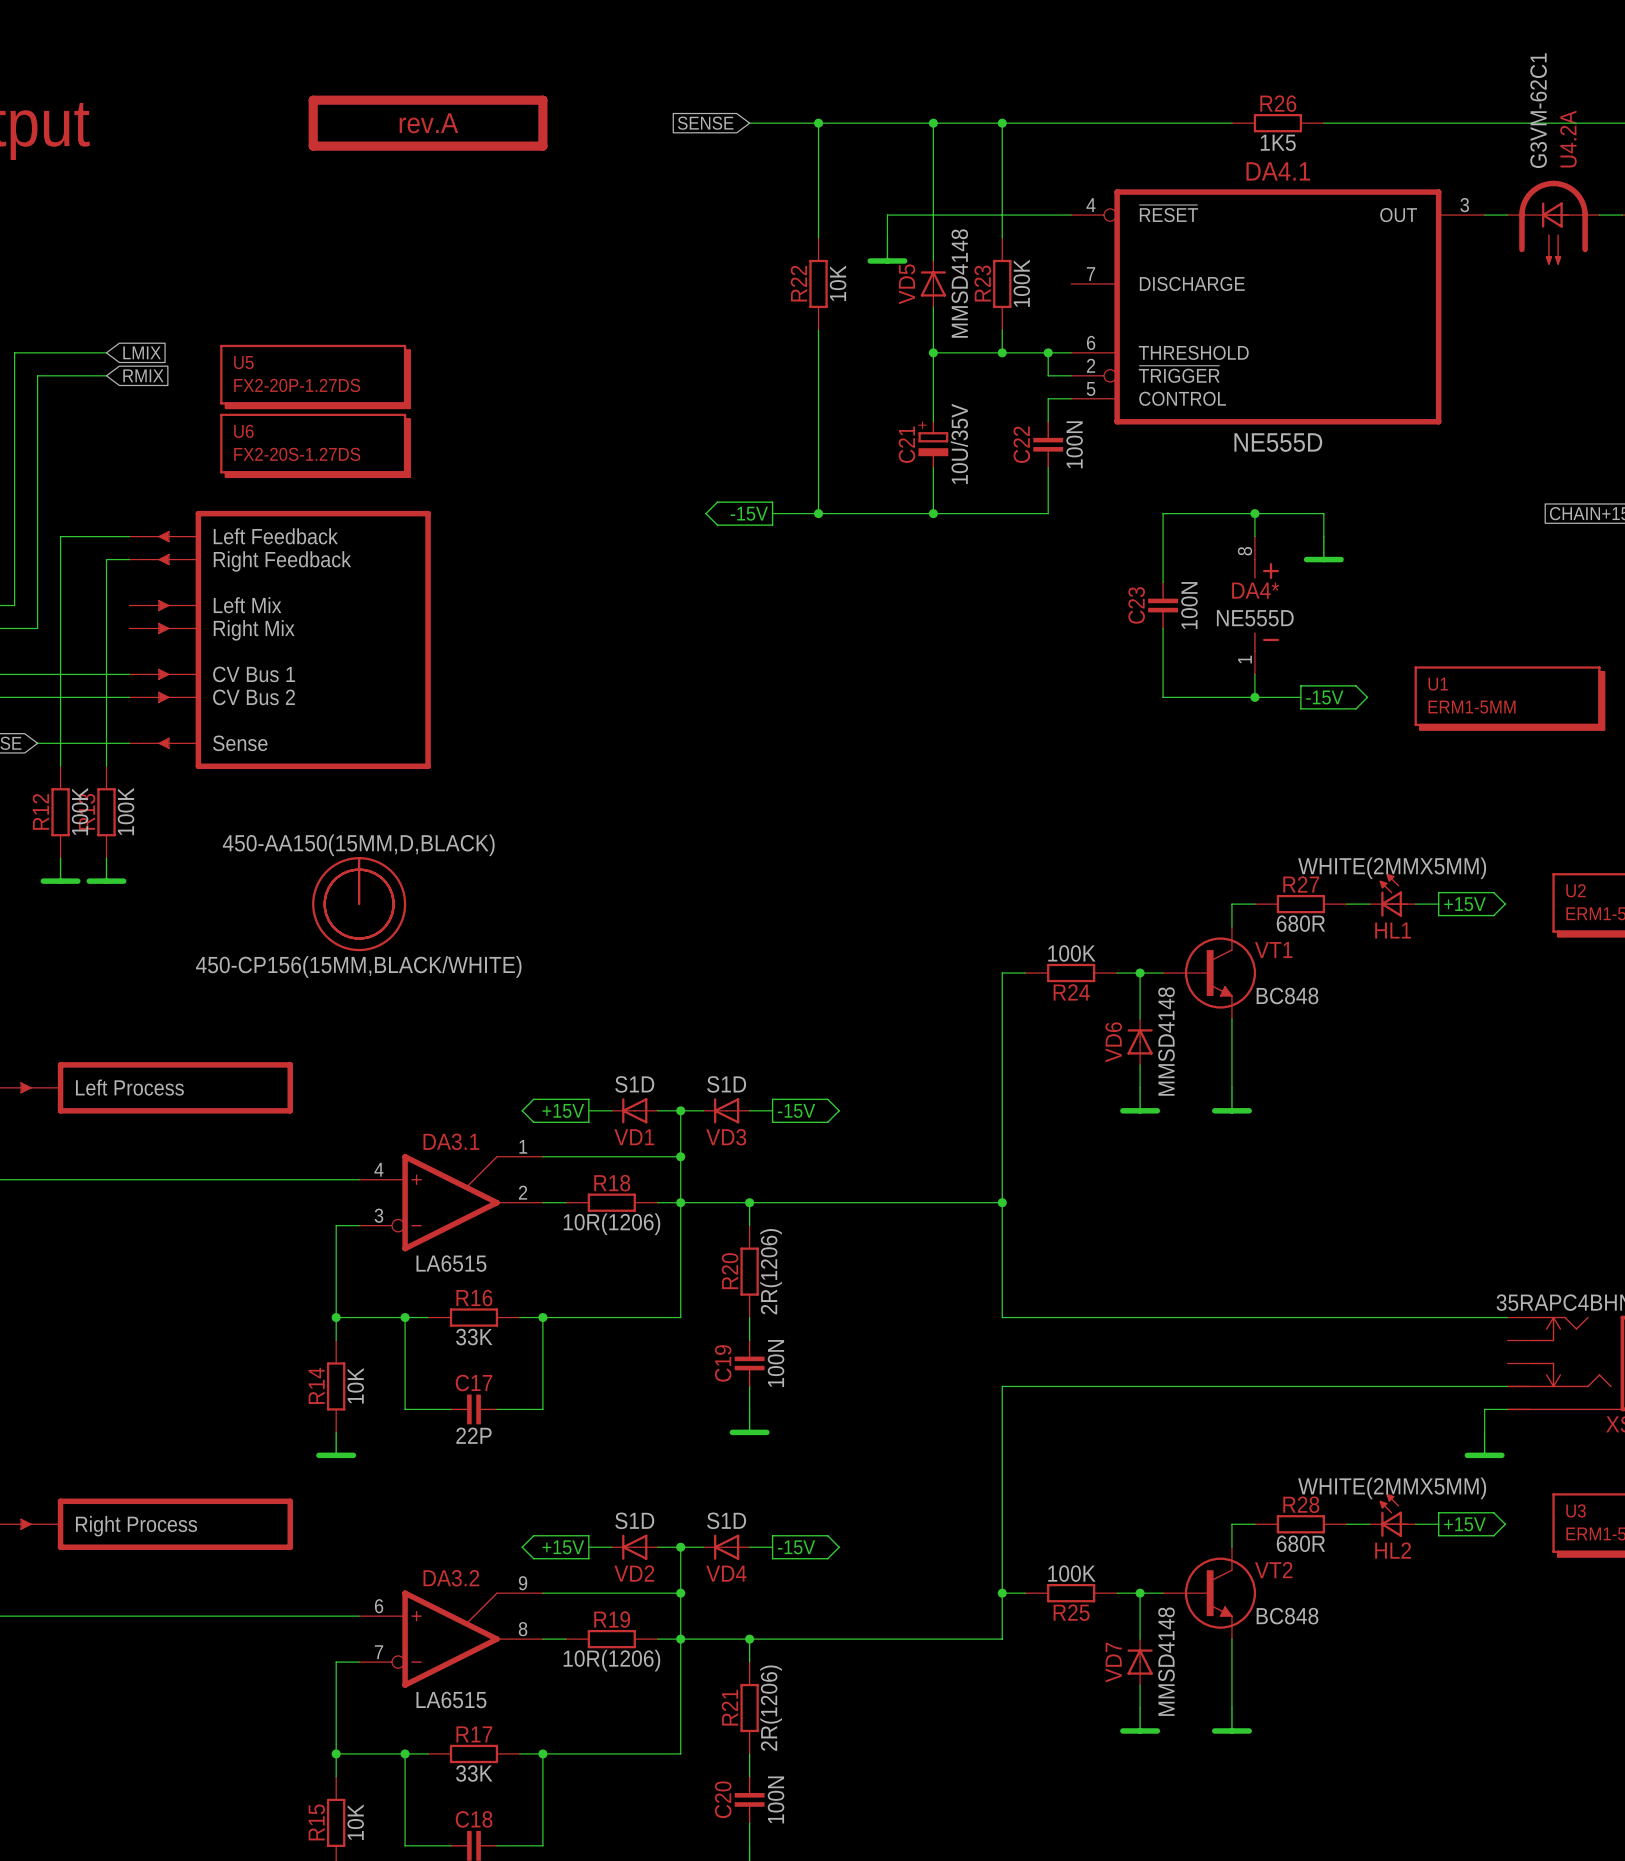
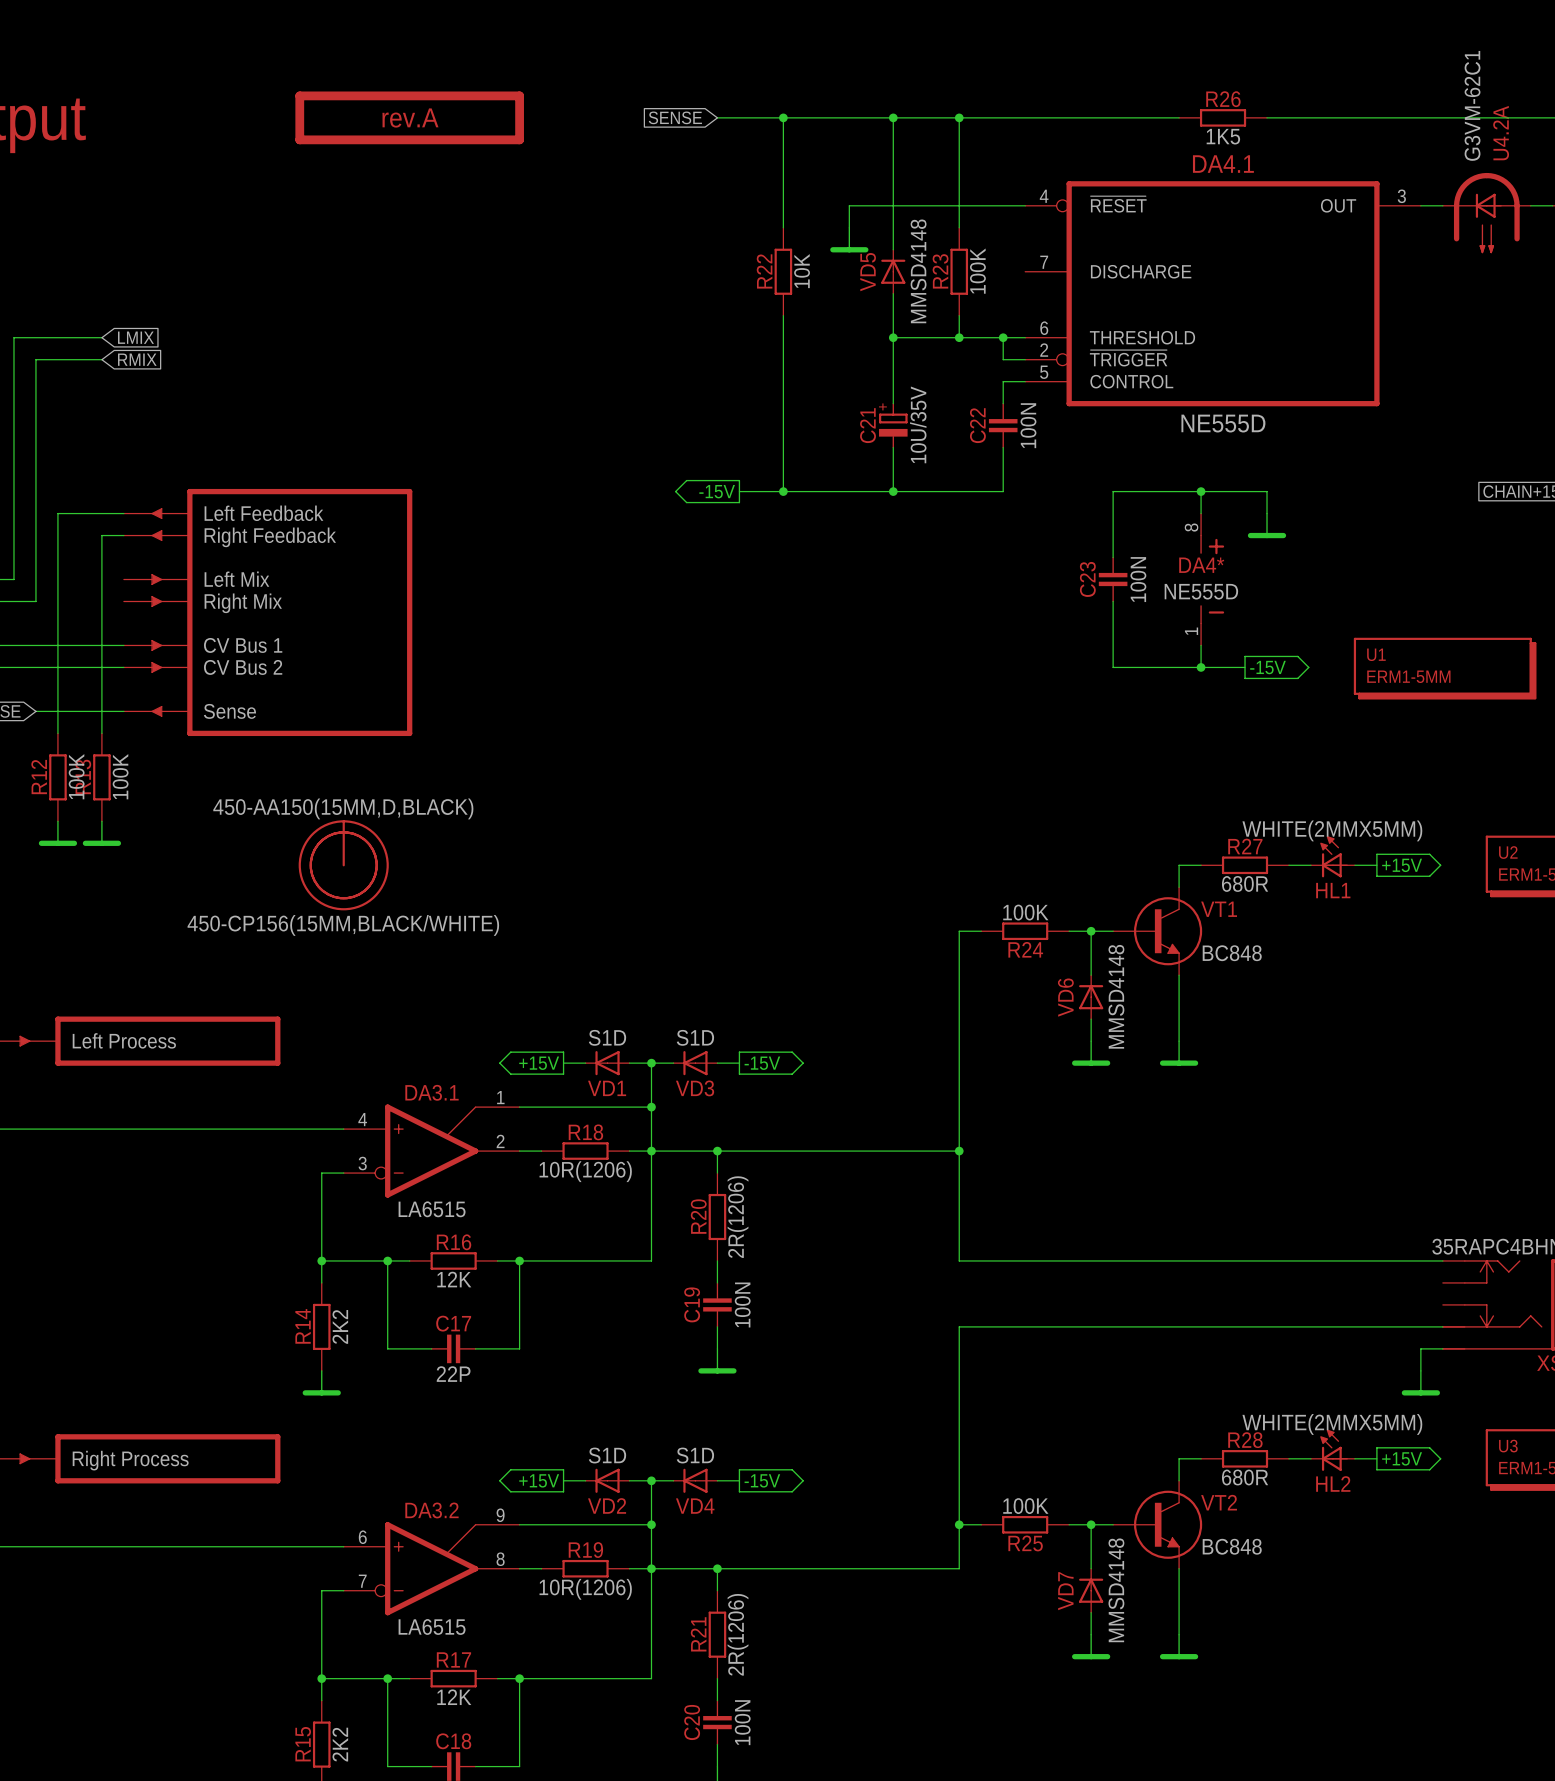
U5: FX2-20P-1.27DS (315, 376) -> none
U6: FX2-20S-1.27DS (315, 445) -> none
R16 value: 33K (474, 1337) -> 12K (454, 1279)
R14 value: 10K (355, 1385) -> 2K2 (340, 1326)
R17 value: 33K (474, 1773) -> 12K (454, 1697)
R15 value: 10K (355, 1822) -> 2K2 (340, 1744)

